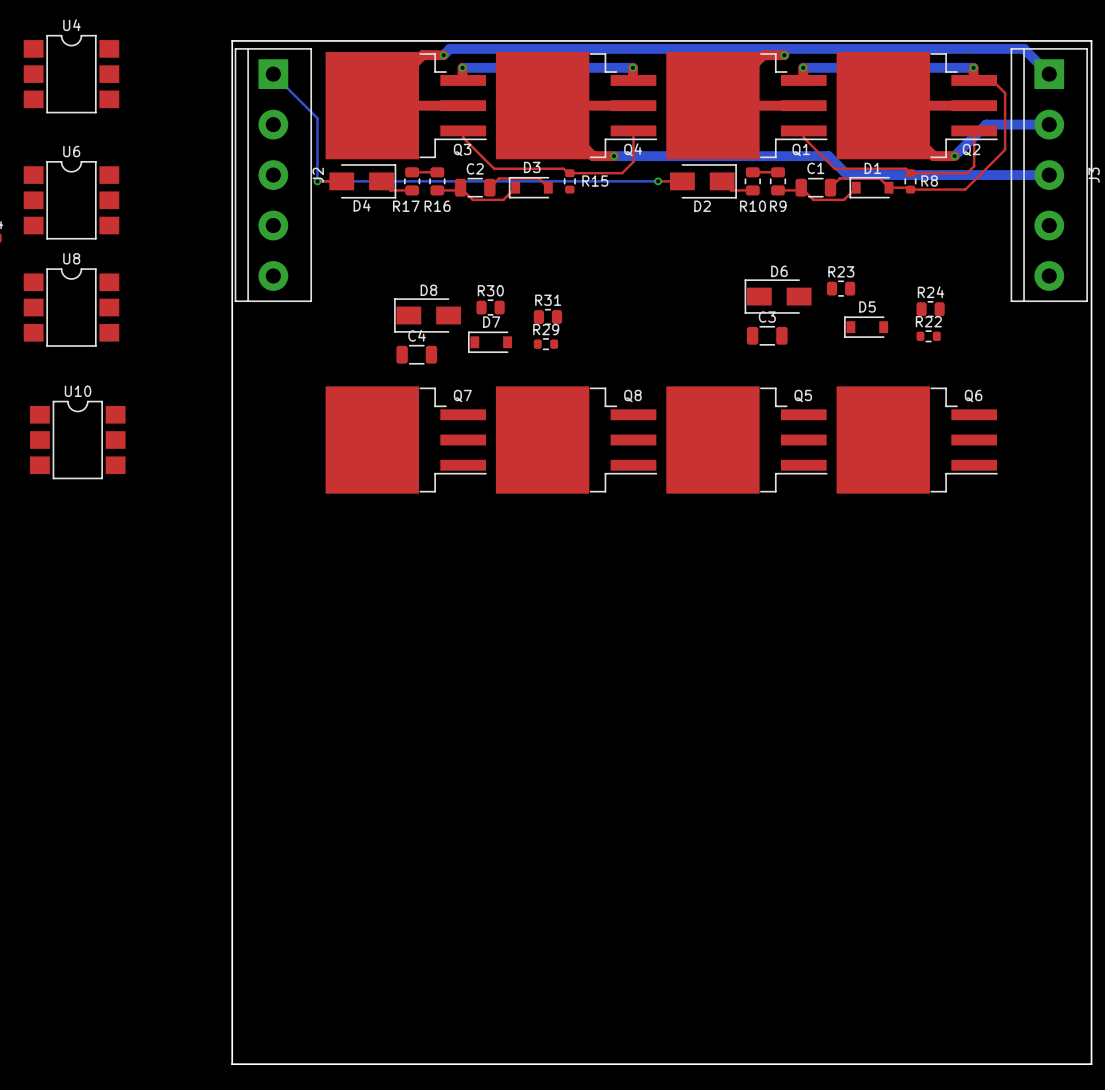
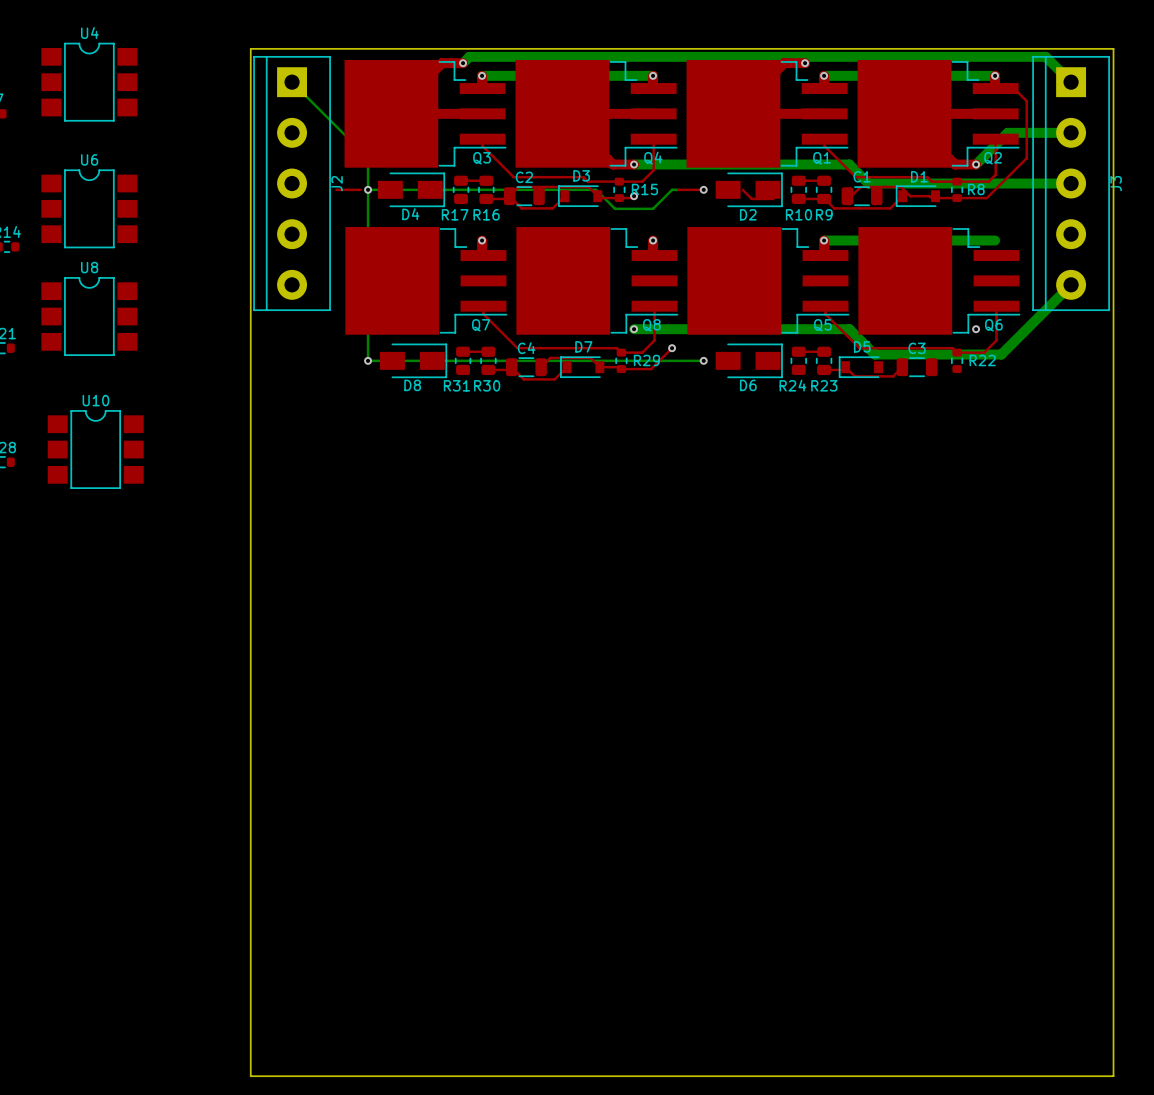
bottom track: (317, 118) (317, 181) (349, 181) -> (336, 126) (368, 158) (368, 360) (703, 360)
top track: (412, 172) (437, 172) -> (461, 180) (486, 180)
top track: (752, 172) (778, 172) -> (824, 180) (798, 180)
top track: (539, 178) (548, 187) -> (558, 186) (588, 186) (599, 198) (632, 198) (634, 196)
via position: (317, 181) -> (368, 189)
D4 position: (362, 181) -> (411, 189)
top track: (381, 181) (390, 190) (412, 190) -> none
R17 position: (412, 181) -> (461, 189)
R16 position: (437, 181) -> (486, 189)
R15 position: (569, 181) -> (619, 189)
bottom track: (576, 181) (651, 181) -> (596, 189) (615, 208) (653, 208) (672, 189)
via: (658, 181) -> none
via: none -> (703, 189)
D2 position: (703, 181) -> (749, 189)
R10: (752, 181) -> none
R9: none -> (824, 189)
R8 position: (910, 181) -> (957, 189)
C2 position: (475, 187) -> (524, 196)
top track: (515, 187) (503, 199) -> (564, 196) (552, 208) (523, 208)
D3 position: (530, 187) -> (580, 196)
via: none -> (634, 196)
C1 position: (815, 187) -> (862, 196)
top track: (856, 187) (844, 199) -> (902, 196) (890, 208) (865, 208)
D1 position: (871, 187) -> (918, 196)
top track: (441, 190) (457, 190) (460, 187) (472, 199) (502, 199) -> (486, 198) (506, 198) (509, 196) (521, 208)
R9 name: R9 (778, 206) -> R10 (798, 214)
via: none -> (482, 240)
top track: none -> (653, 240) (654, 255)
via: none -> (653, 240)
bottom track: none -> (824, 240) (995, 240)
via: none -> (824, 240)
top track: none -> (483, 241) (482, 240) (483, 255)
top track: none -> (825, 241) (824, 240) (825, 255)
R23 name position: R23 (841, 271) -> R23 (824, 385)
bottom track: none -> (1071, 284) (1001, 354) (874, 354) (849, 329) (634, 329)
R23 rotation: 0° (841, 288) -> 90° clockwise (824, 360)
R23 position: (841, 288) -> (824, 360)
R30 name position: R30 (490, 290) -> R30 (487, 385)
R24 name position: R24 (931, 292) -> R24 (792, 385)
D6 rotation: 0° (778, 296) -> 180° (749, 360)
D6 position: (778, 296) -> (749, 360)
top track: none -> (483, 306) (483, 314) (517, 348) (616, 348) (621, 352) (642, 352) (654, 340) (654, 306)
top track: none -> (825, 306) (825, 314) (859, 348) (952, 348) (957, 352) (984, 352) (996, 340) (996, 306)
R31 name position: R31 (548, 300) -> R31 (456, 385)
R30 rotation: 0° (490, 307) -> 90° clockwise (488, 360)
R30 position: (490, 307) -> (488, 360)
R24 rotation: 0° (930, 309) -> 90° clockwise (798, 360)
R24 position: (930, 309) -> (798, 360)
D8 rotation: 0° (427, 315) -> 180° (413, 360)
D8 position: (427, 315) -> (413, 360)
R31 rotation: 0° (547, 317) -> 90° clockwise (463, 360)
R31 position: (547, 317) -> (463, 360)
via: none -> (634, 329)
via: none -> (976, 329)
D5 position: (866, 327) -> (861, 367)
C3 position: (767, 335) -> (917, 367)
R22 rotation: 0° (928, 336) -> 90° clockwise (957, 360)
R22 position: (928, 336) -> (957, 360)
top track: none -> (672, 348) (651, 369) (599, 367) (590, 357) (550, 357) (541, 367)
via: none -> (672, 348)
top track: none -> (463, 351) (488, 351)
D7 position: (490, 342) -> (582, 367)
top track: none -> (798, 351) (824, 351)
R29 rotation: 0° (545, 344) -> 90° clockwise (621, 360)
R29 position: (545, 344) -> (621, 360)
via: none -> (368, 360)
via: none -> (703, 360)
C4 position: (416, 354) -> (526, 367)
top track: none -> (566, 367) (554, 379) (523, 379) (511, 367) (508, 369) (488, 369)
top track: none -> (902, 367) (893, 376) (854, 376) (845, 367) (842, 369) (824, 369)
Q7 name position: Q7 (462, 395) -> Q7 (481, 325)
Q8 name position: Q8 (632, 395) -> Q8 (651, 325)
Q5 name position: Q5 (803, 395) -> Q5 (822, 325)
Q6 name position: Q6 (973, 395) -> Q6 (993, 325)
Q7 position: (406, 440) -> (426, 280)
Q8 position: (576, 440) -> (597, 280)
Q5 position: (746, 440) -> (768, 280)
Q6 position: (917, 440) -> (939, 280)

